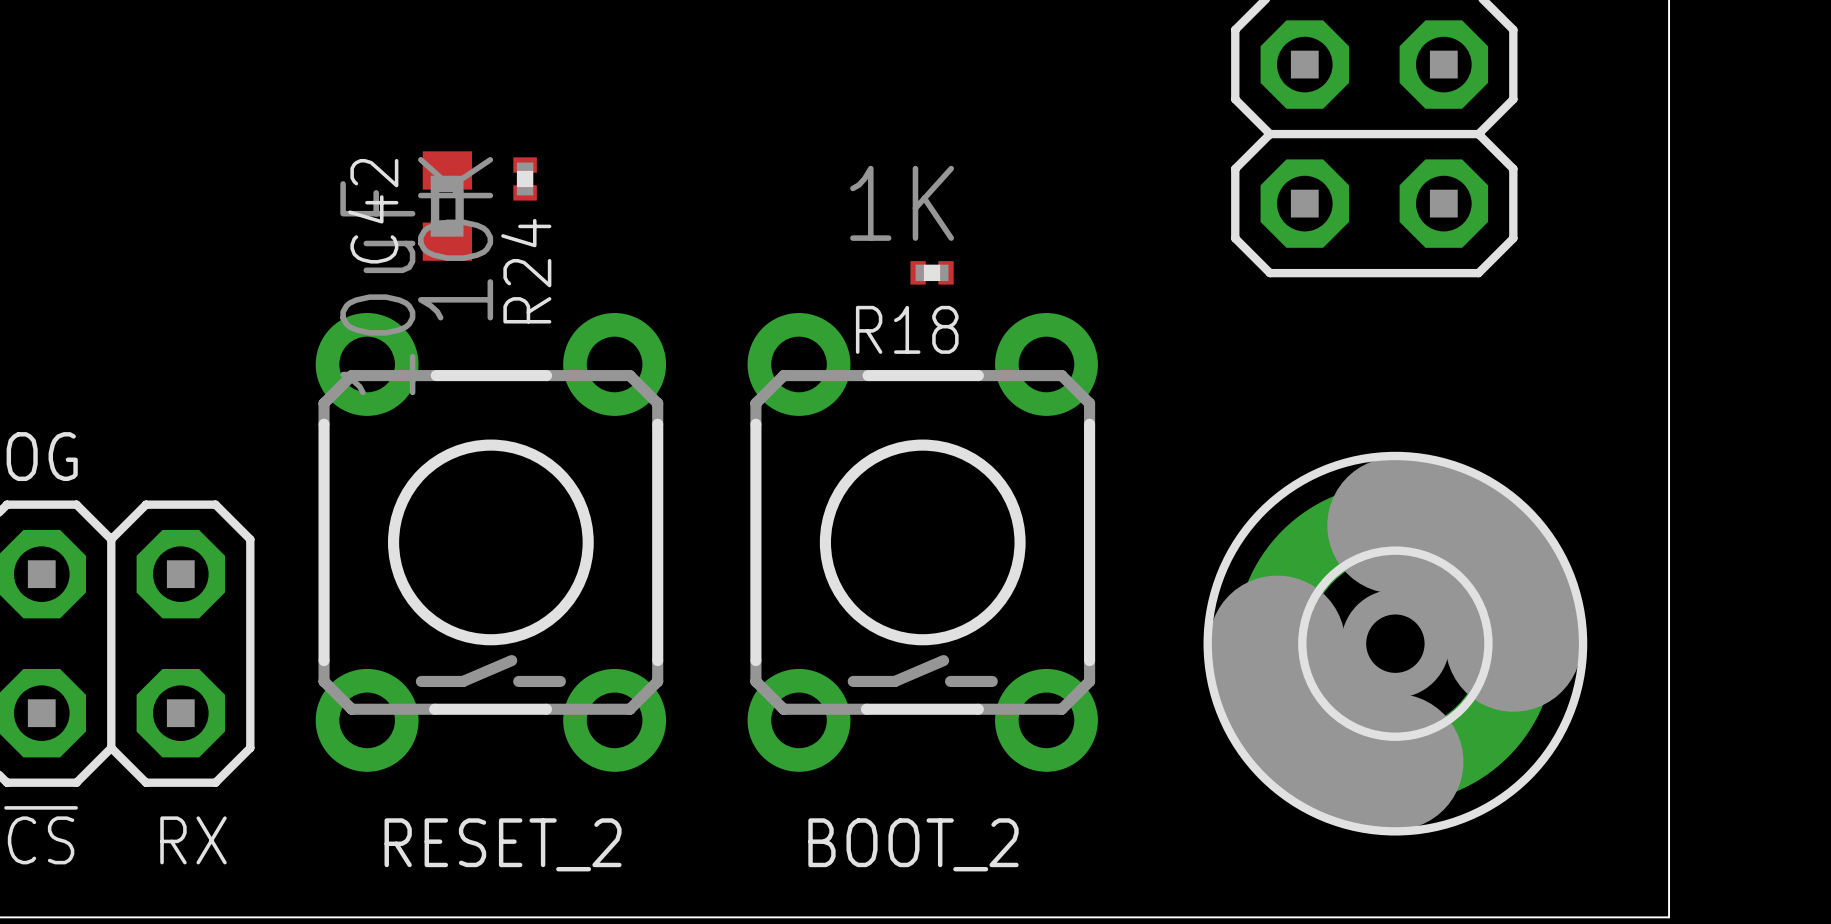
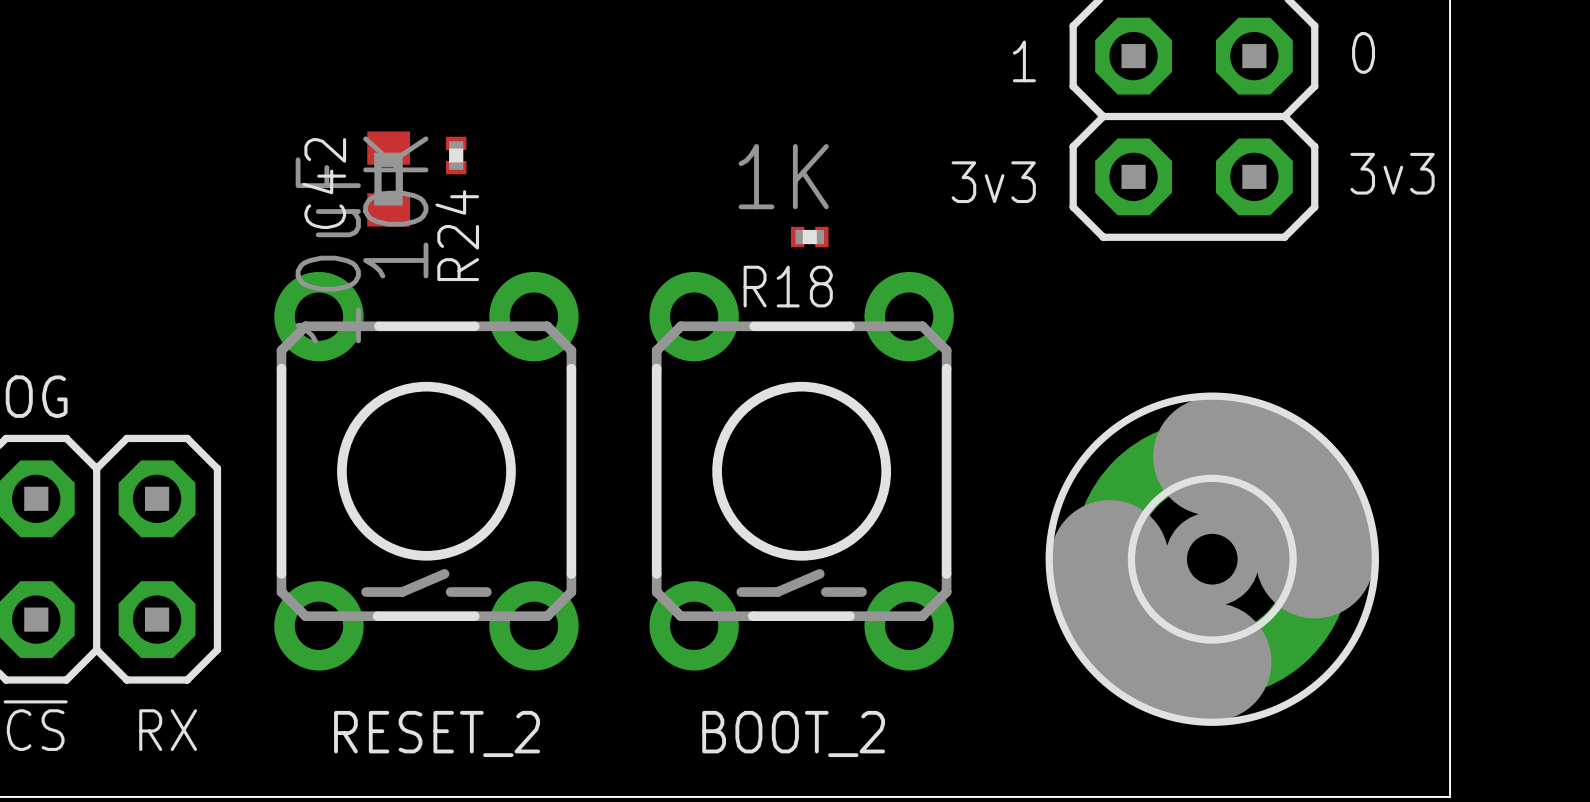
text: none -> 0 (1363, 52)
text: none -> 1 (1024, 61)
text: none -> 3v3 (1392, 173)
text: none -> 3v3 (993, 182)

